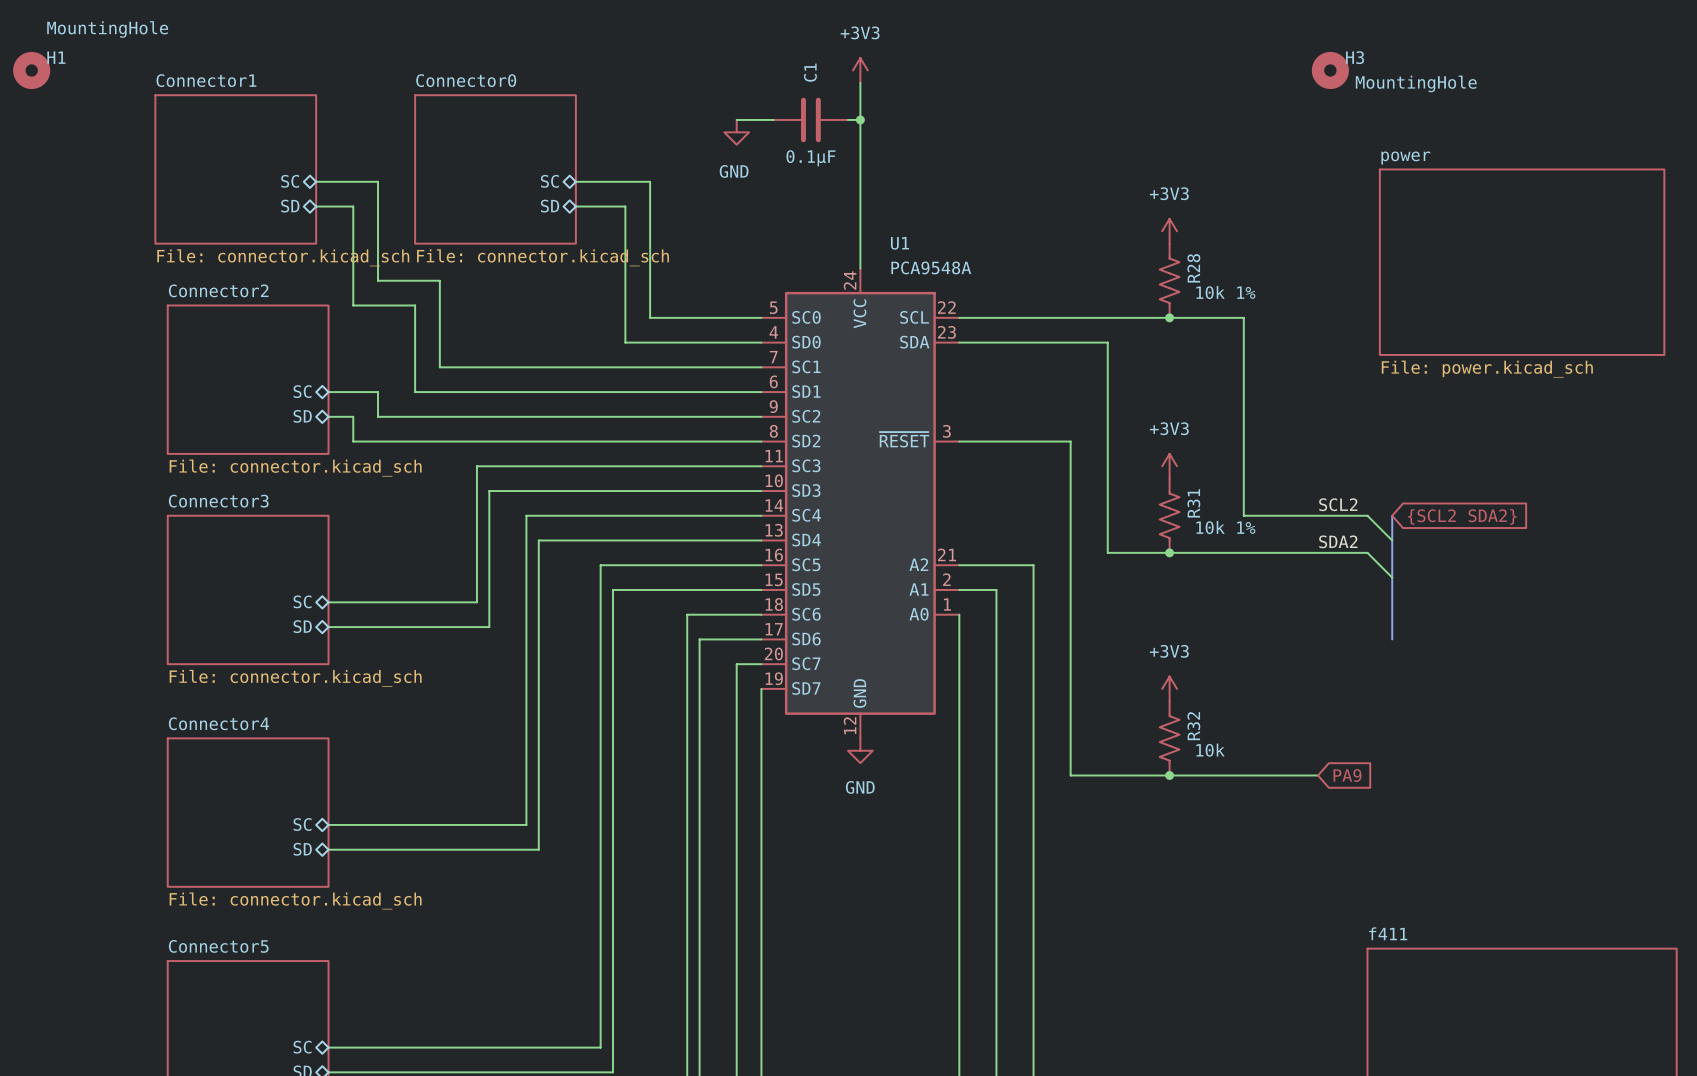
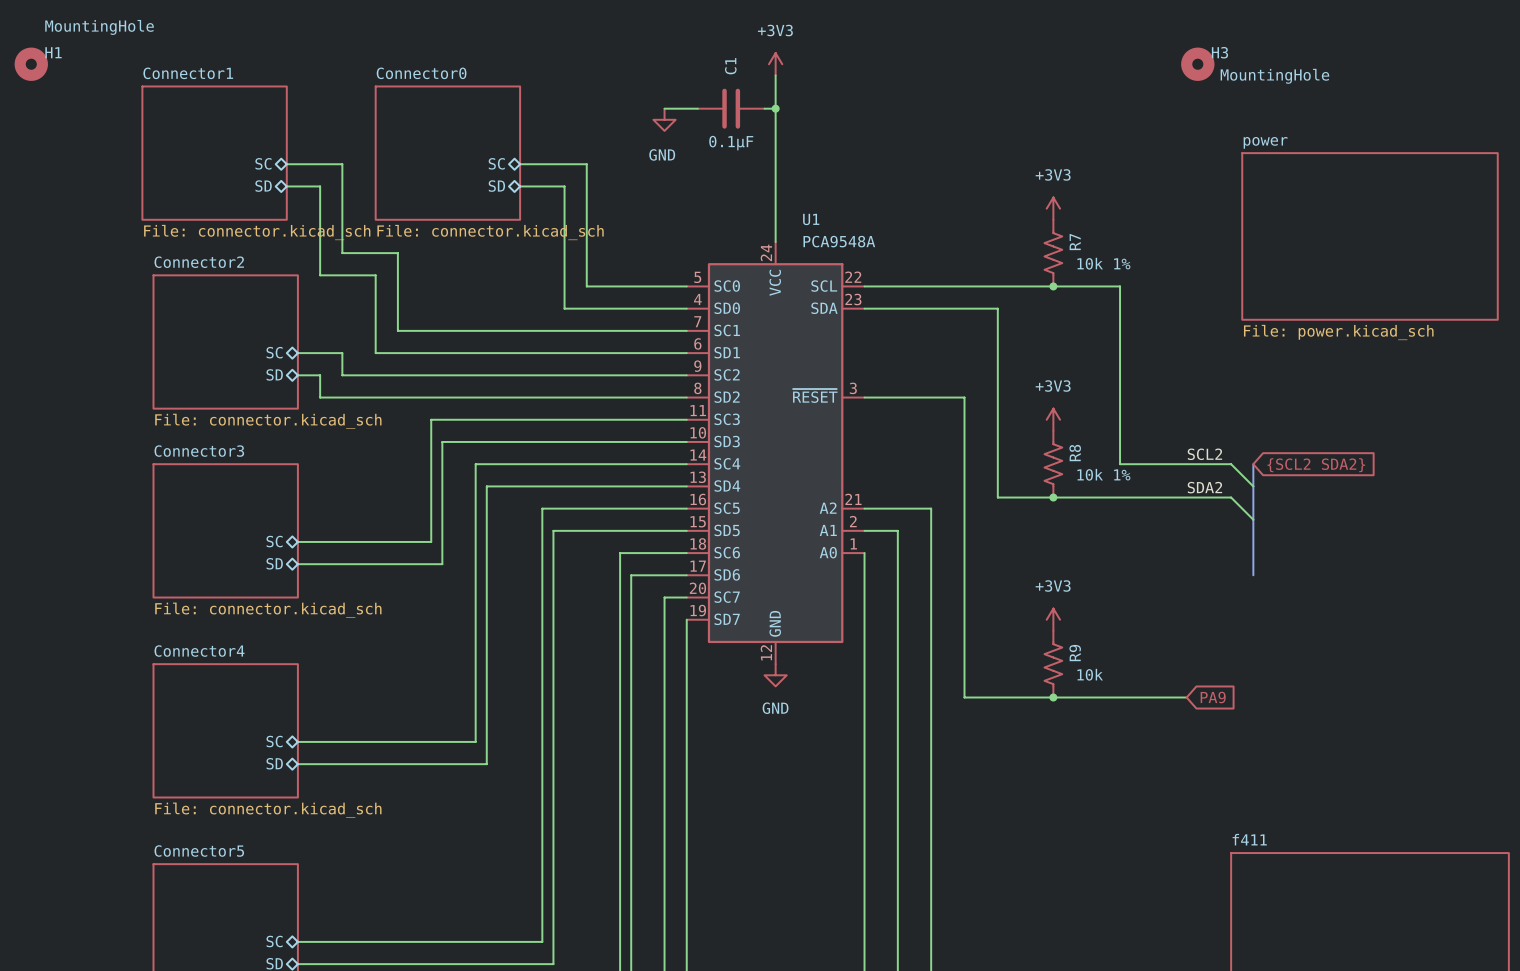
R28 name: R28 (1193, 268) -> R7 (1075, 242)
R31 name: R31 (1193, 503) -> R8 (1075, 453)
R32 name: R32 (1193, 726) -> R9 (1075, 653)

